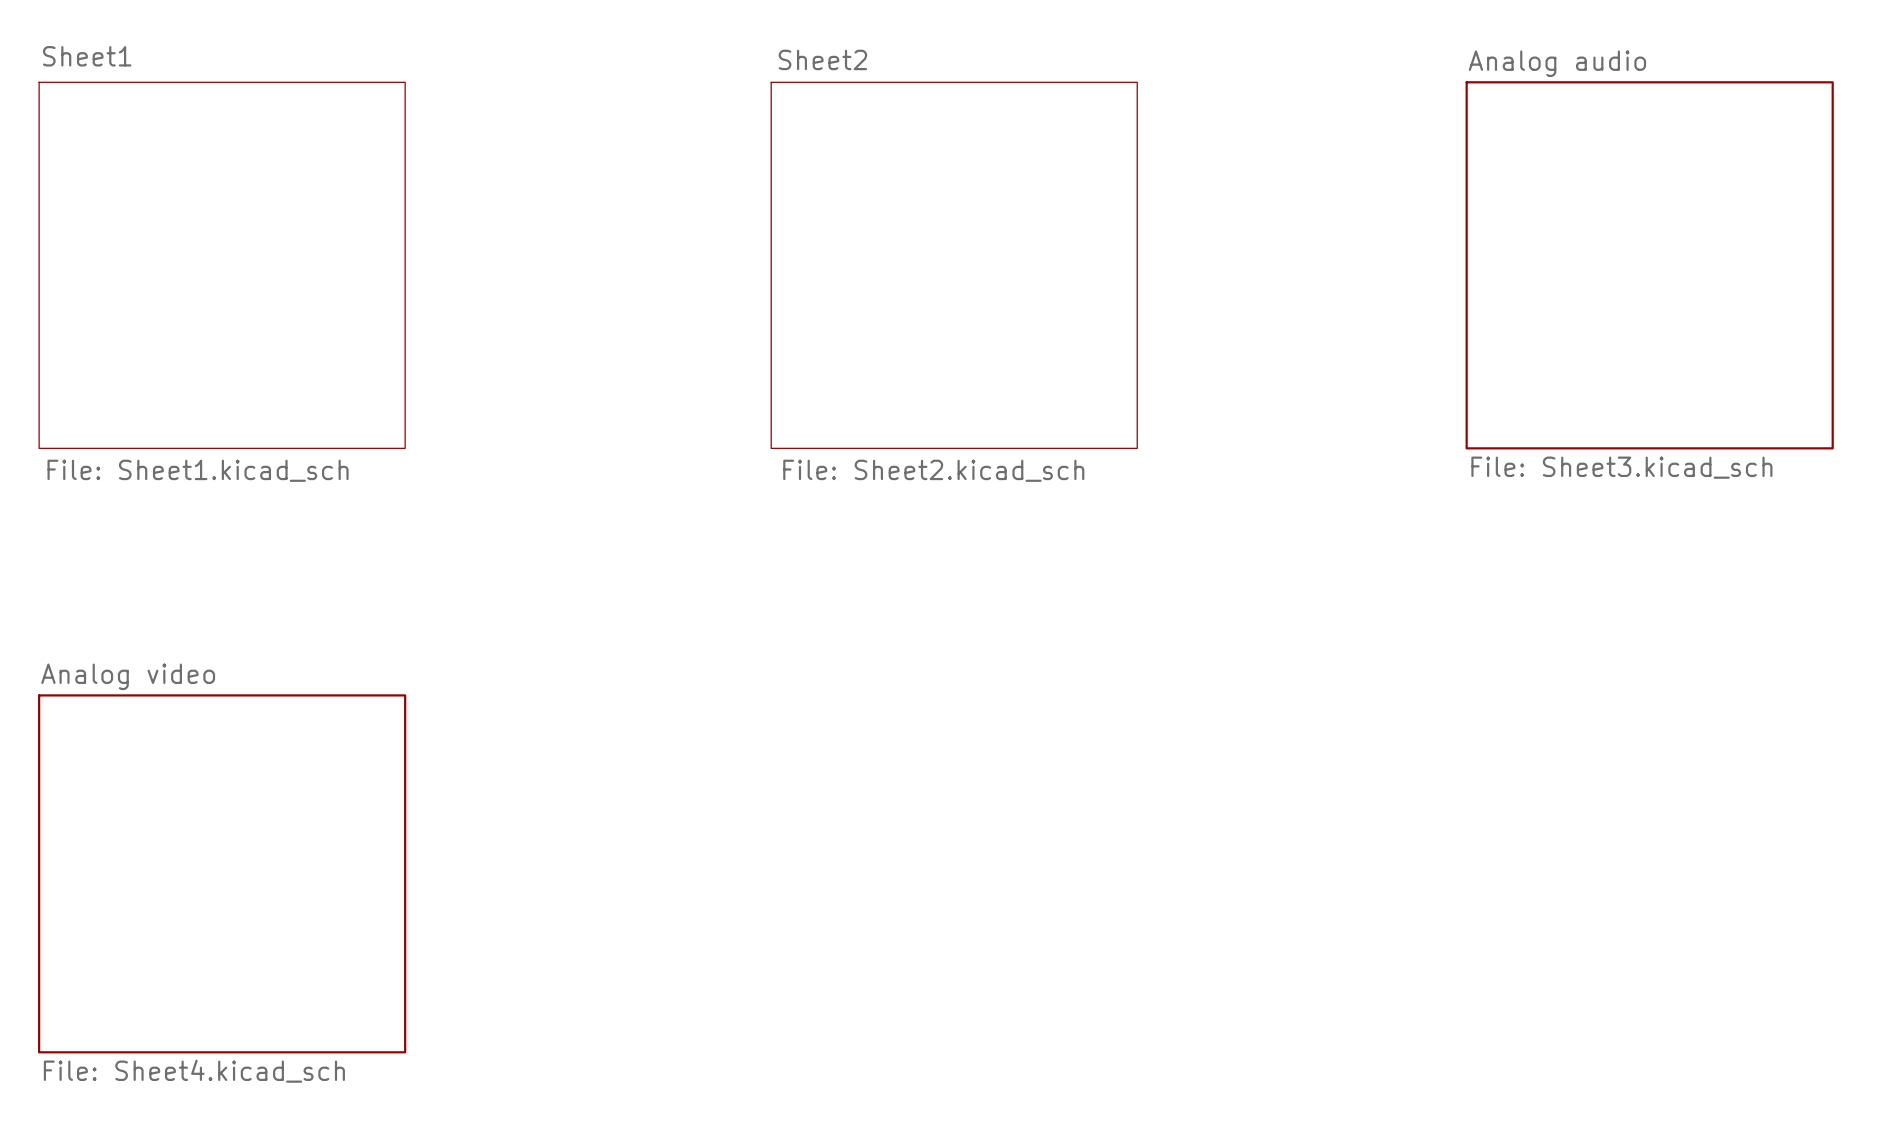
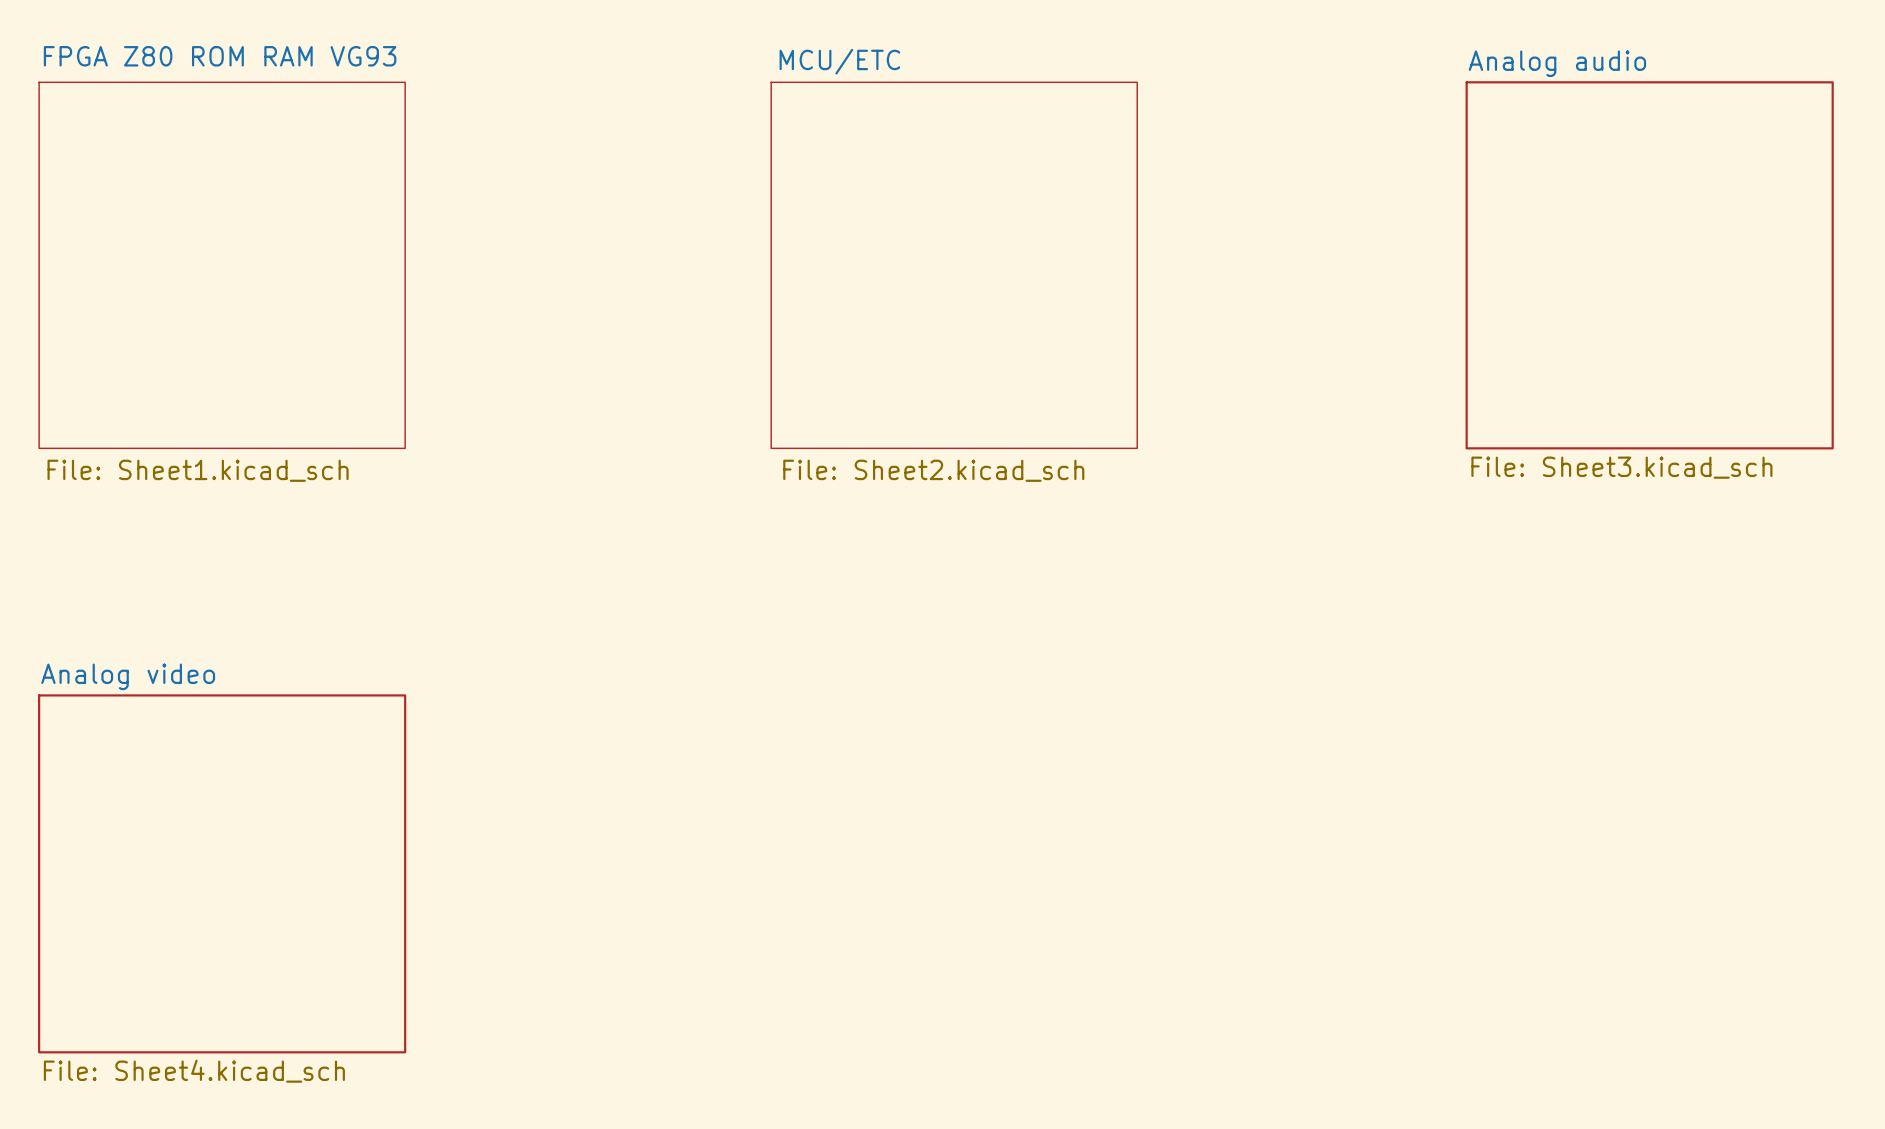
sheet Sheet1 name: Sheet1 (87, 56) -> FPGA Z80 ROM RAM VG93 (220, 56)
sheet Sheet2 name: Sheet2 (822, 59) -> MCU/ETC (839, 61)

